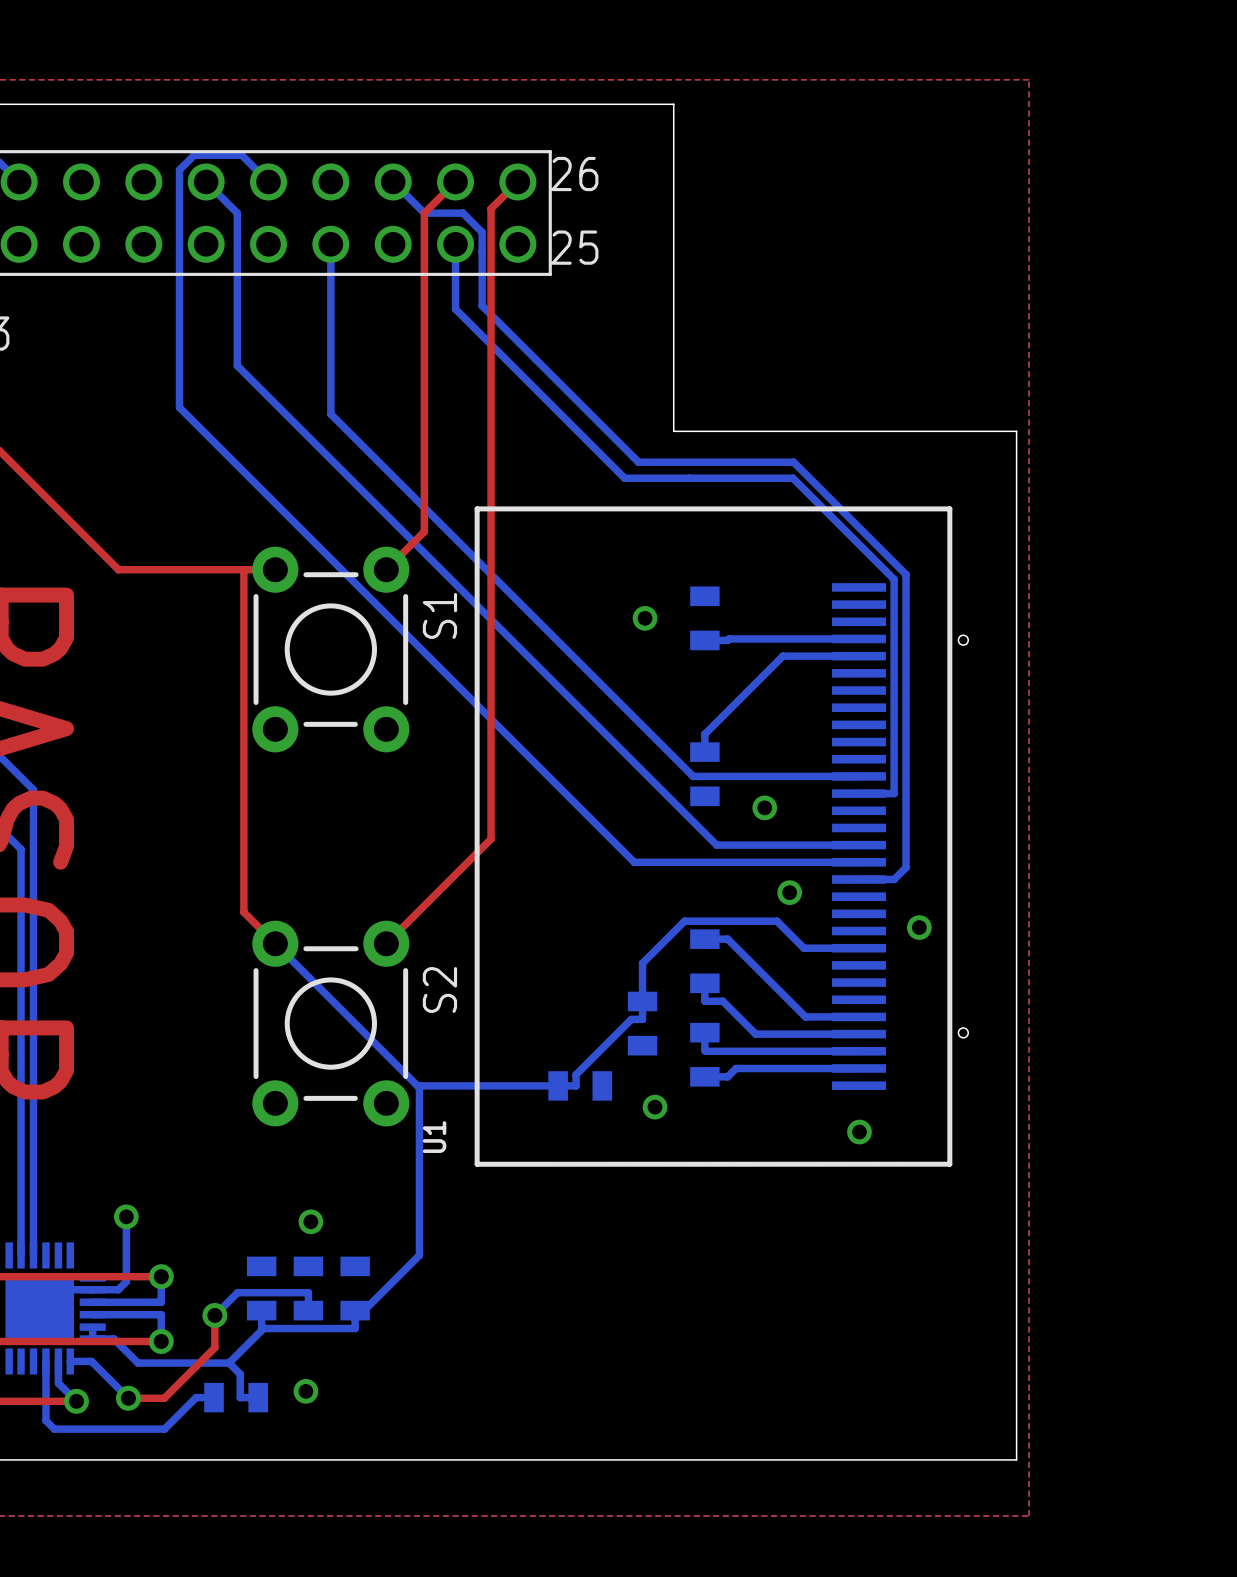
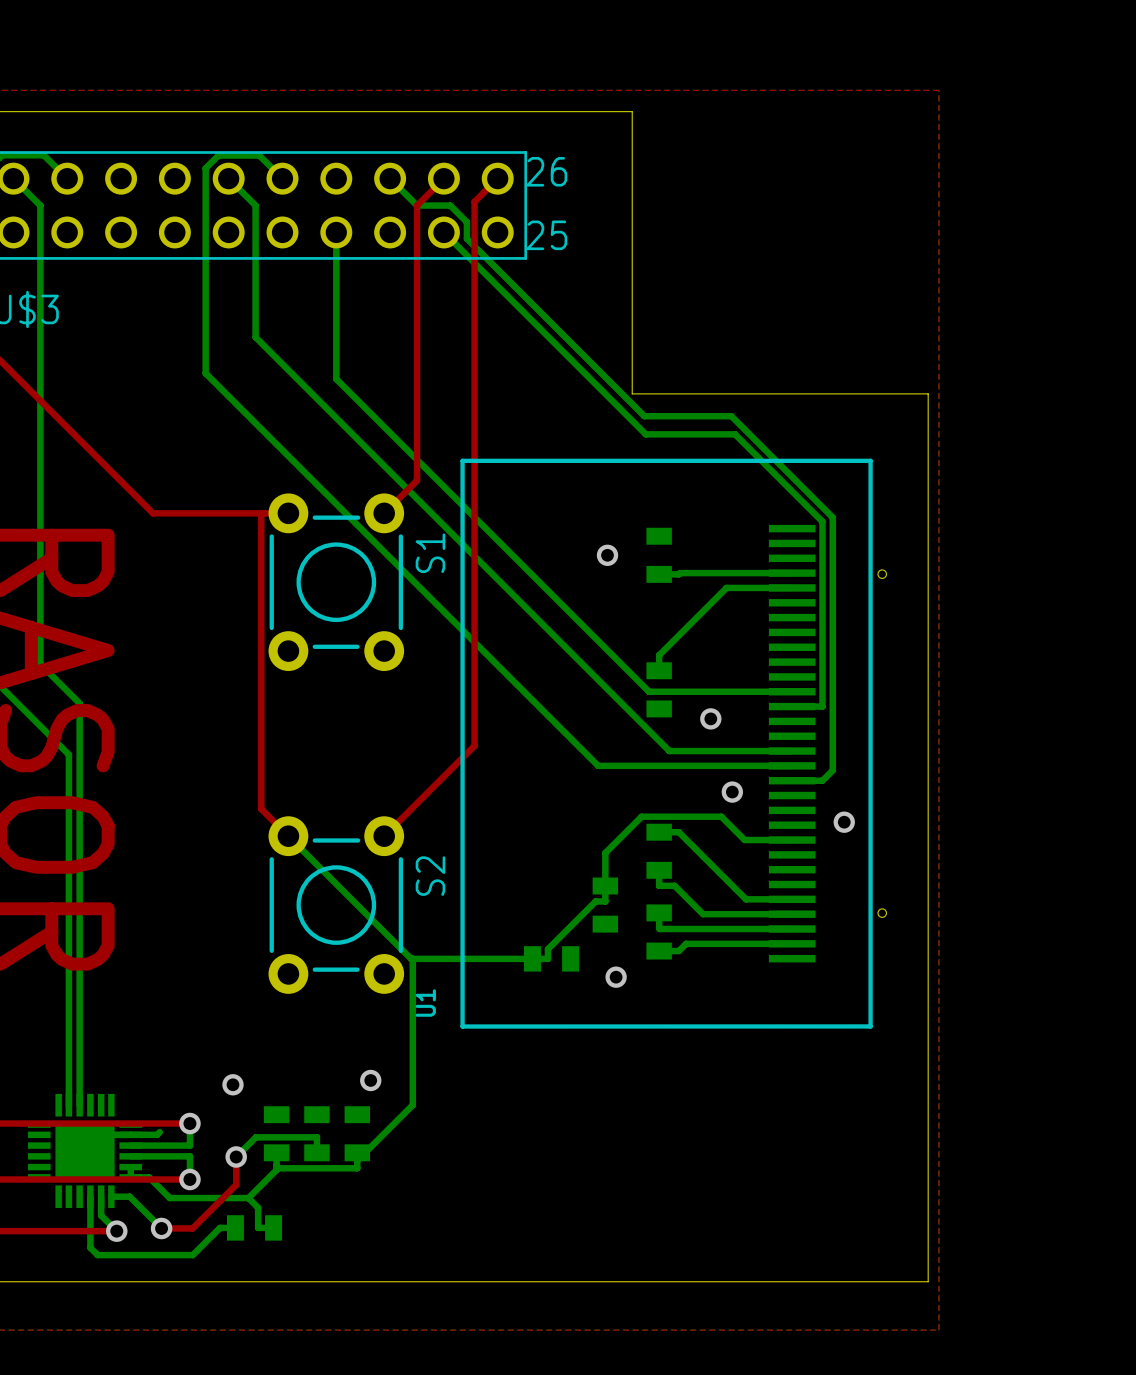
bottom track: (455, 244) (455, 309) (624, 478) (689, 478) -> (443, 232) (645, 434)
bottom track: (482, 251) (482, 305) (638, 462) (793, 462) -> (466, 238) (644, 416) (731, 416) (735, 420)
via: (859, 1132) -> none
bottom track: (126, 1216) (126, 1281) (118, 1289) -> (159, 1132) (157, 1134) (152, 1134)
via: (126, 1216) -> none
via: (310, 1221) -> none
via: none -> (370, 1080)
via: none -> (232, 1084)
via: (305, 1391) -> none

